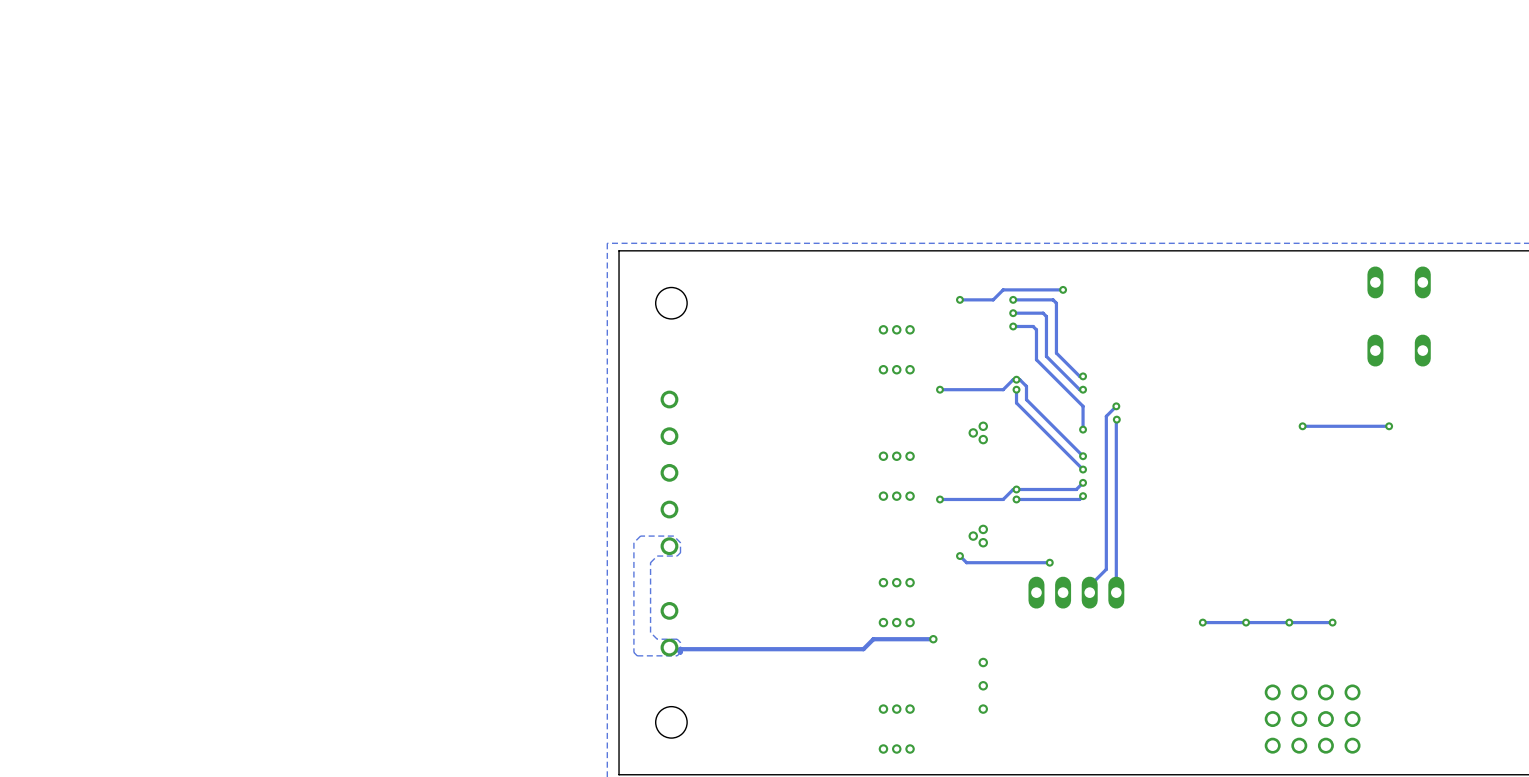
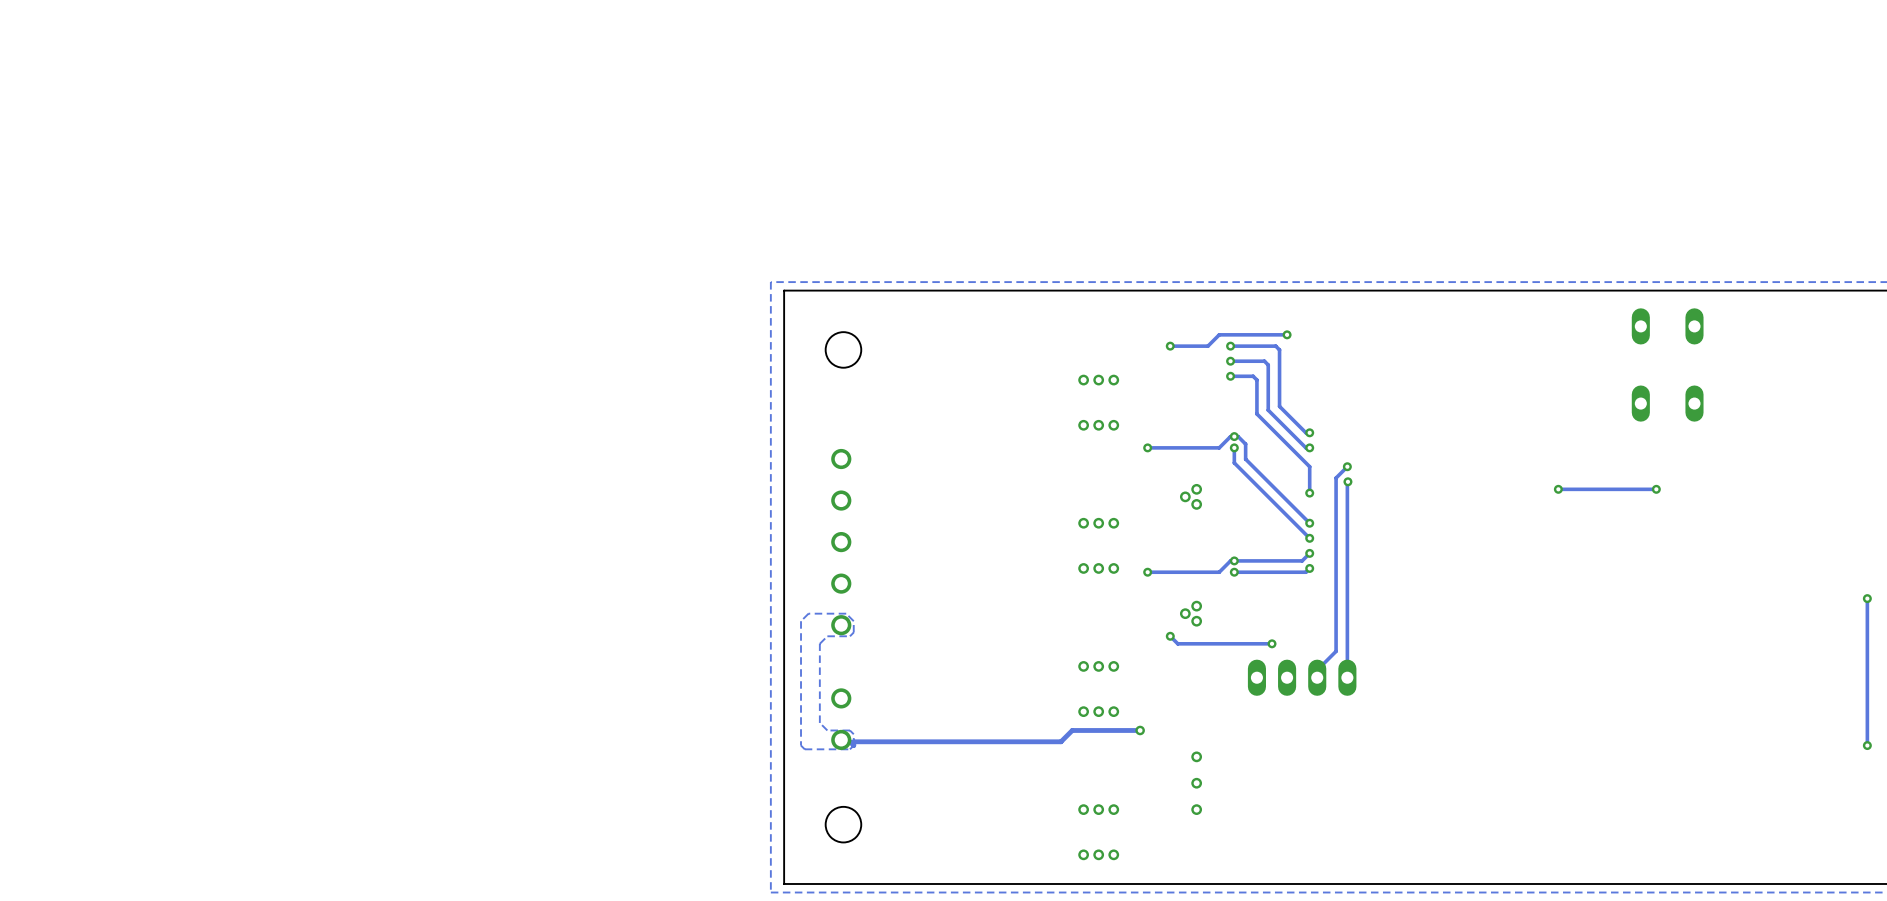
via: (1202, 622) -> none
via: (1246, 622) -> none
via: (1289, 622) -> none
track: (1332, 622) (1202, 622) -> none
via: (1332, 622) -> none
part: (1272, 719) -> none
part: (1299, 719) -> none
part: (1325, 719) -> none
part: (1352, 719) -> none

